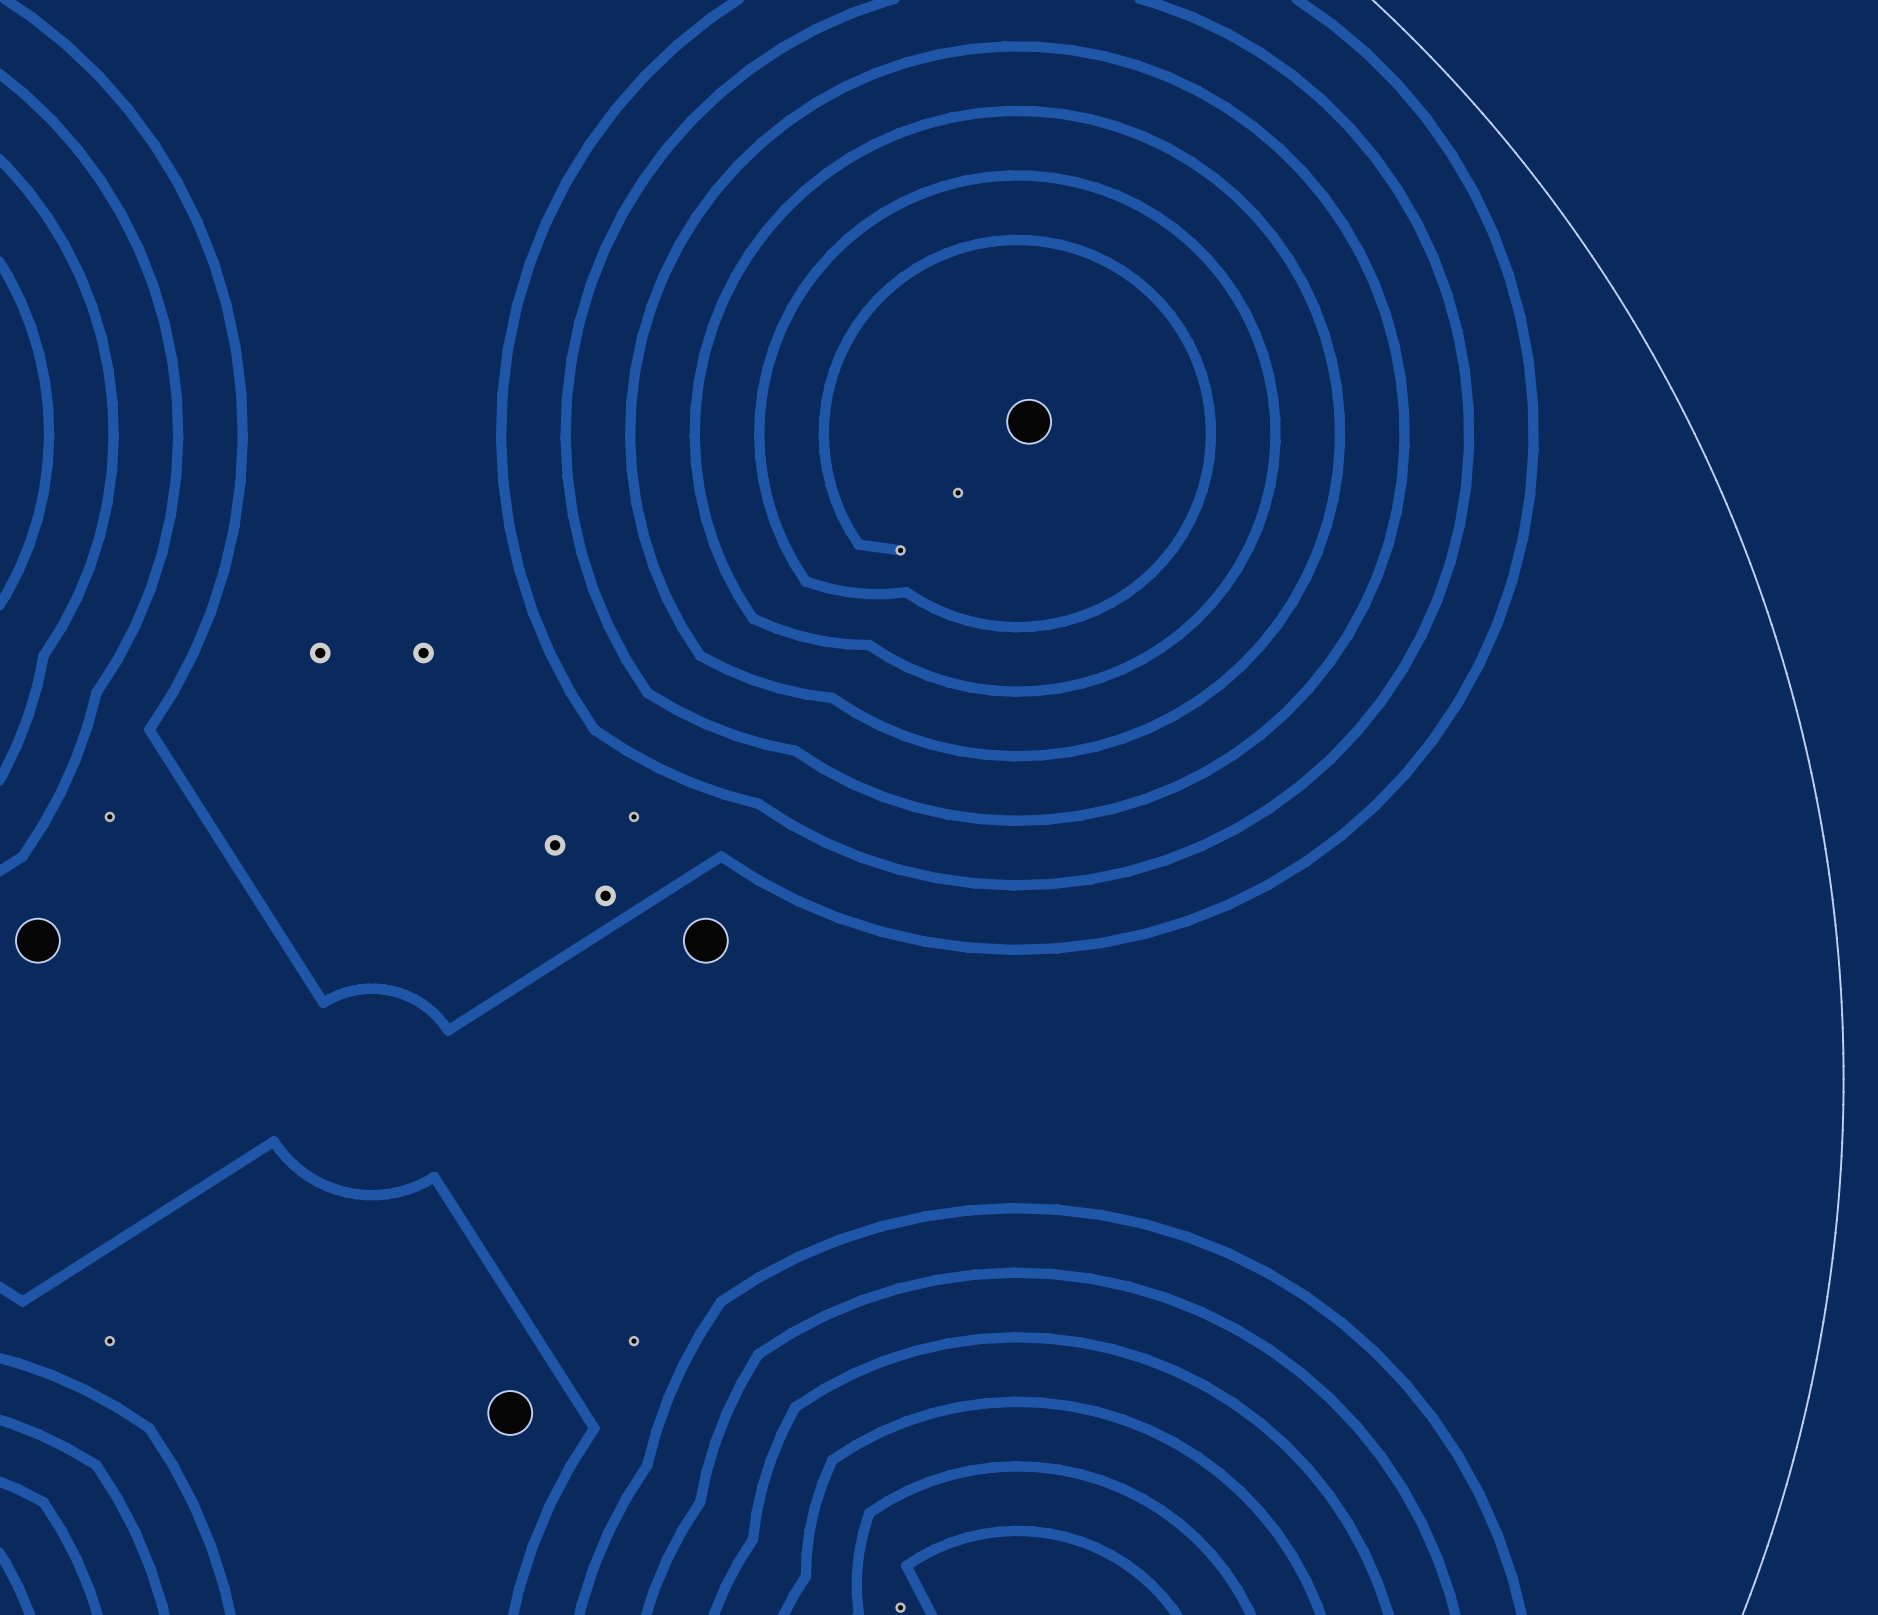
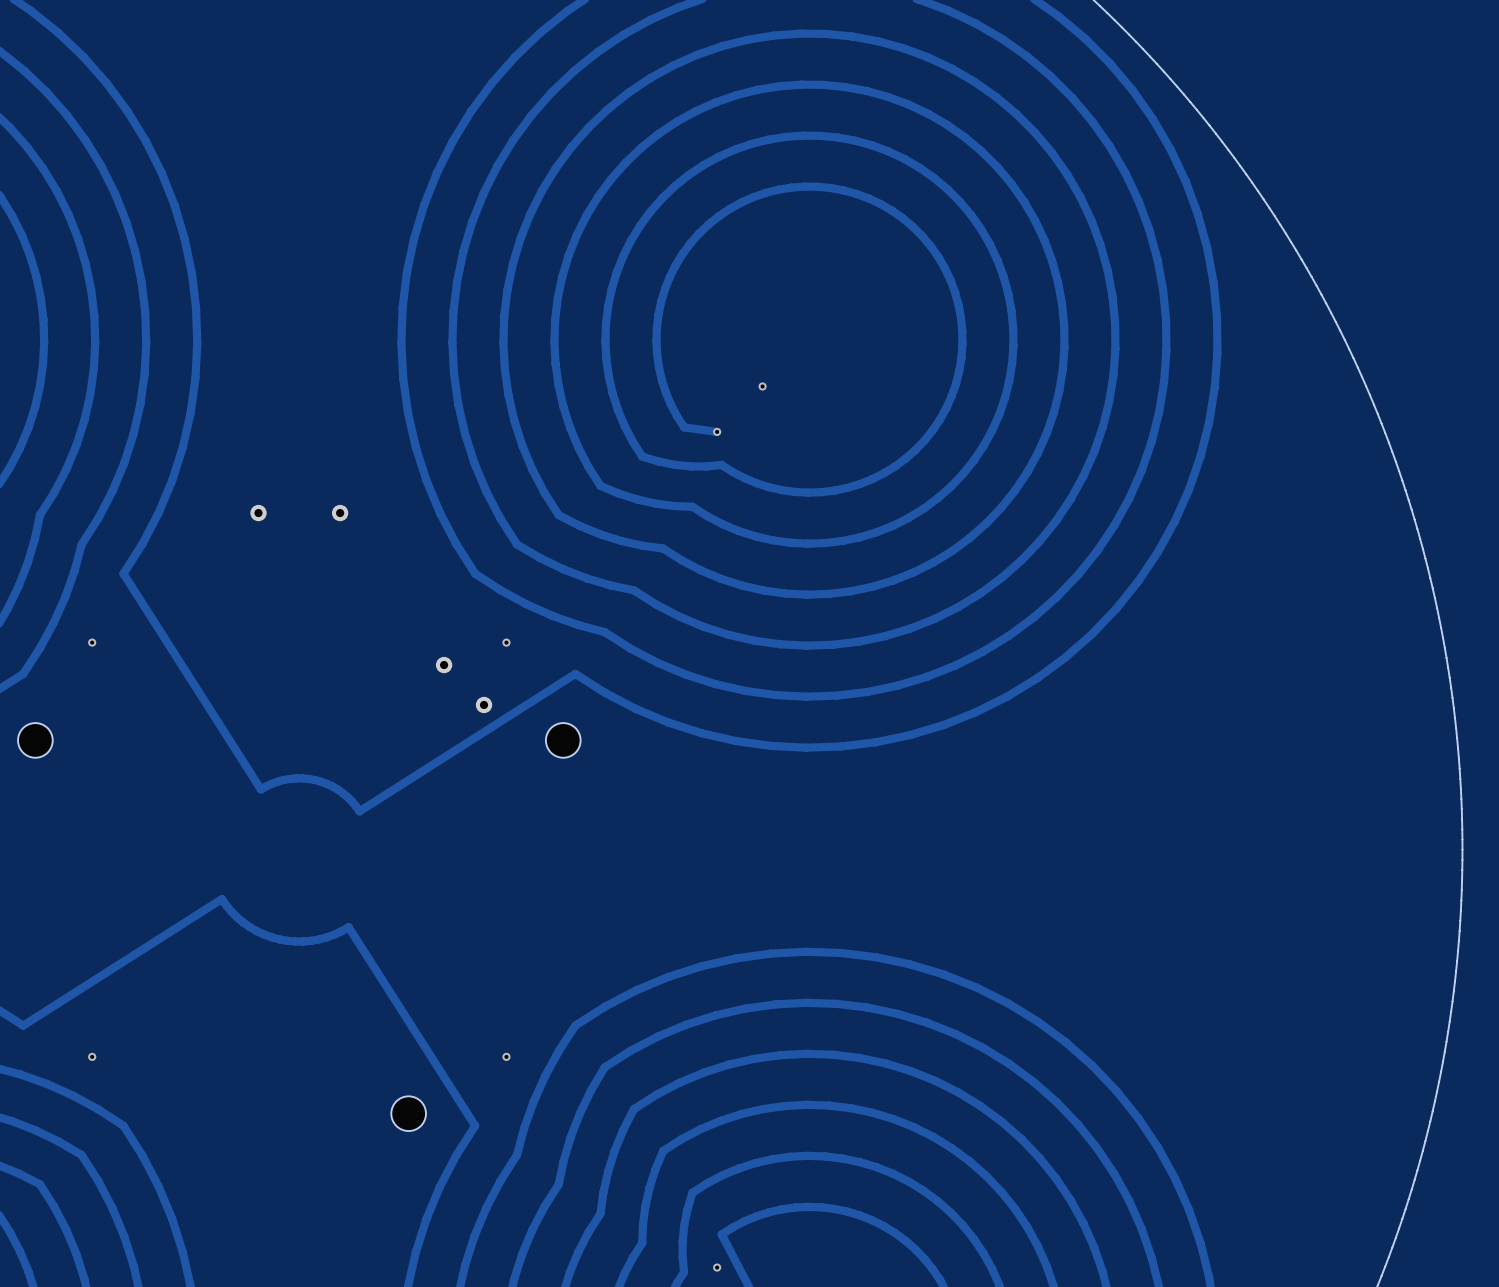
part: (1029, 421) -> none

